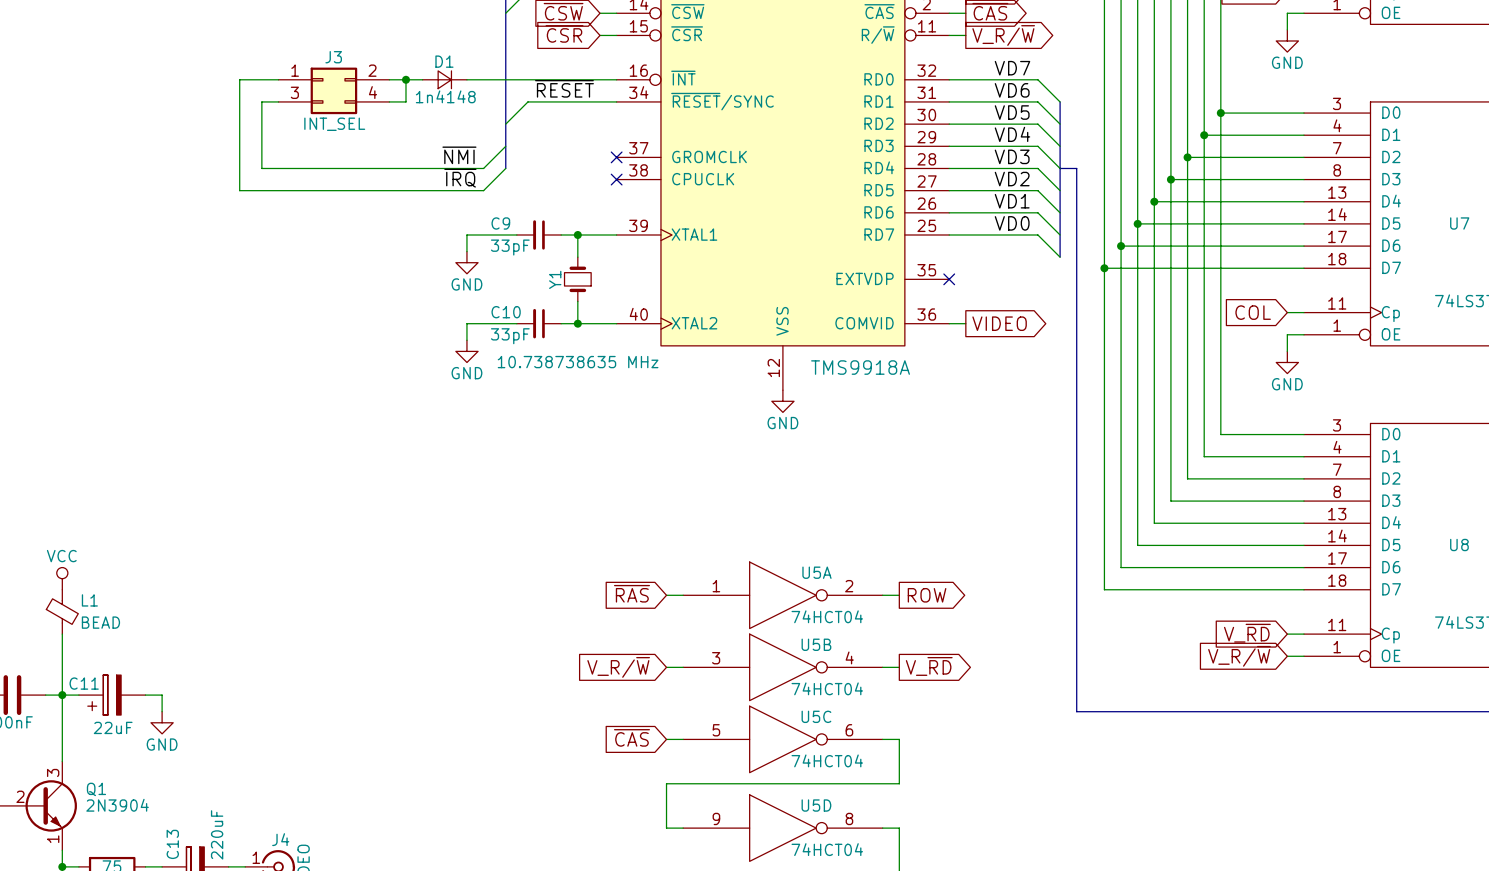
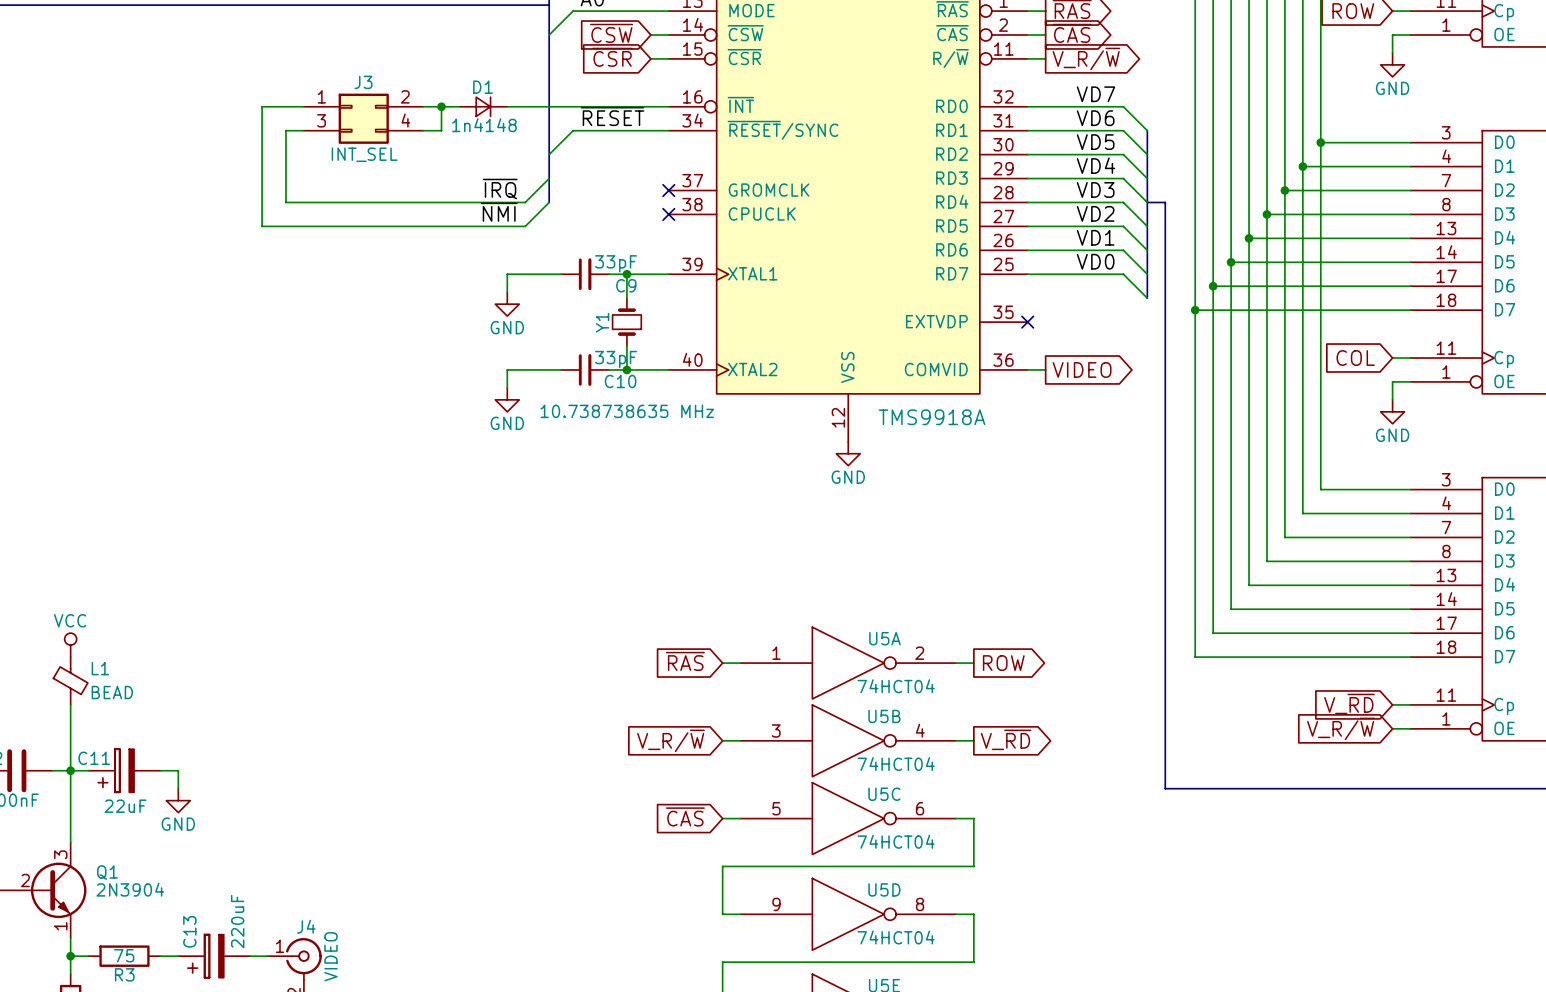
label: ~{NMI} (459, 155) -> ~{IRQ} (500, 188)
label: ~{IRQ} (460, 178) -> ~{NMI} (499, 212)
C9 rotation: 0° (538, 234) -> 180° (585, 274)
C10 rotation: 0° (538, 323) -> 180° (585, 369)

